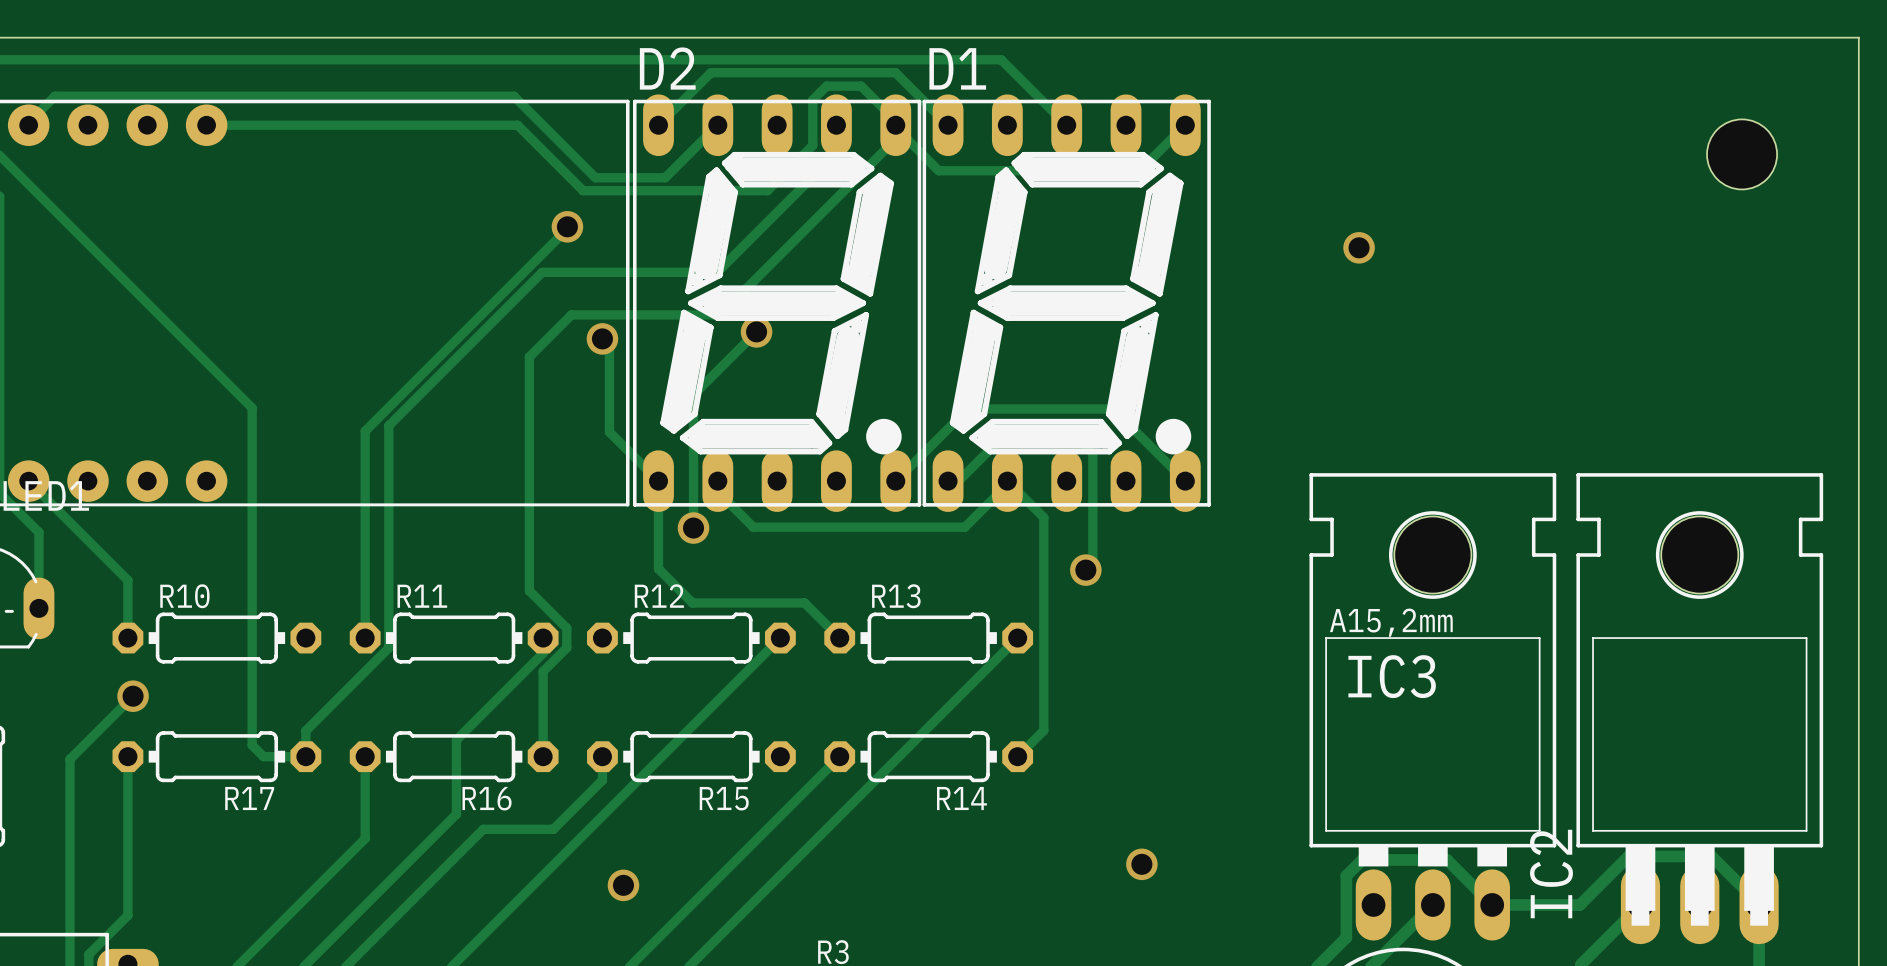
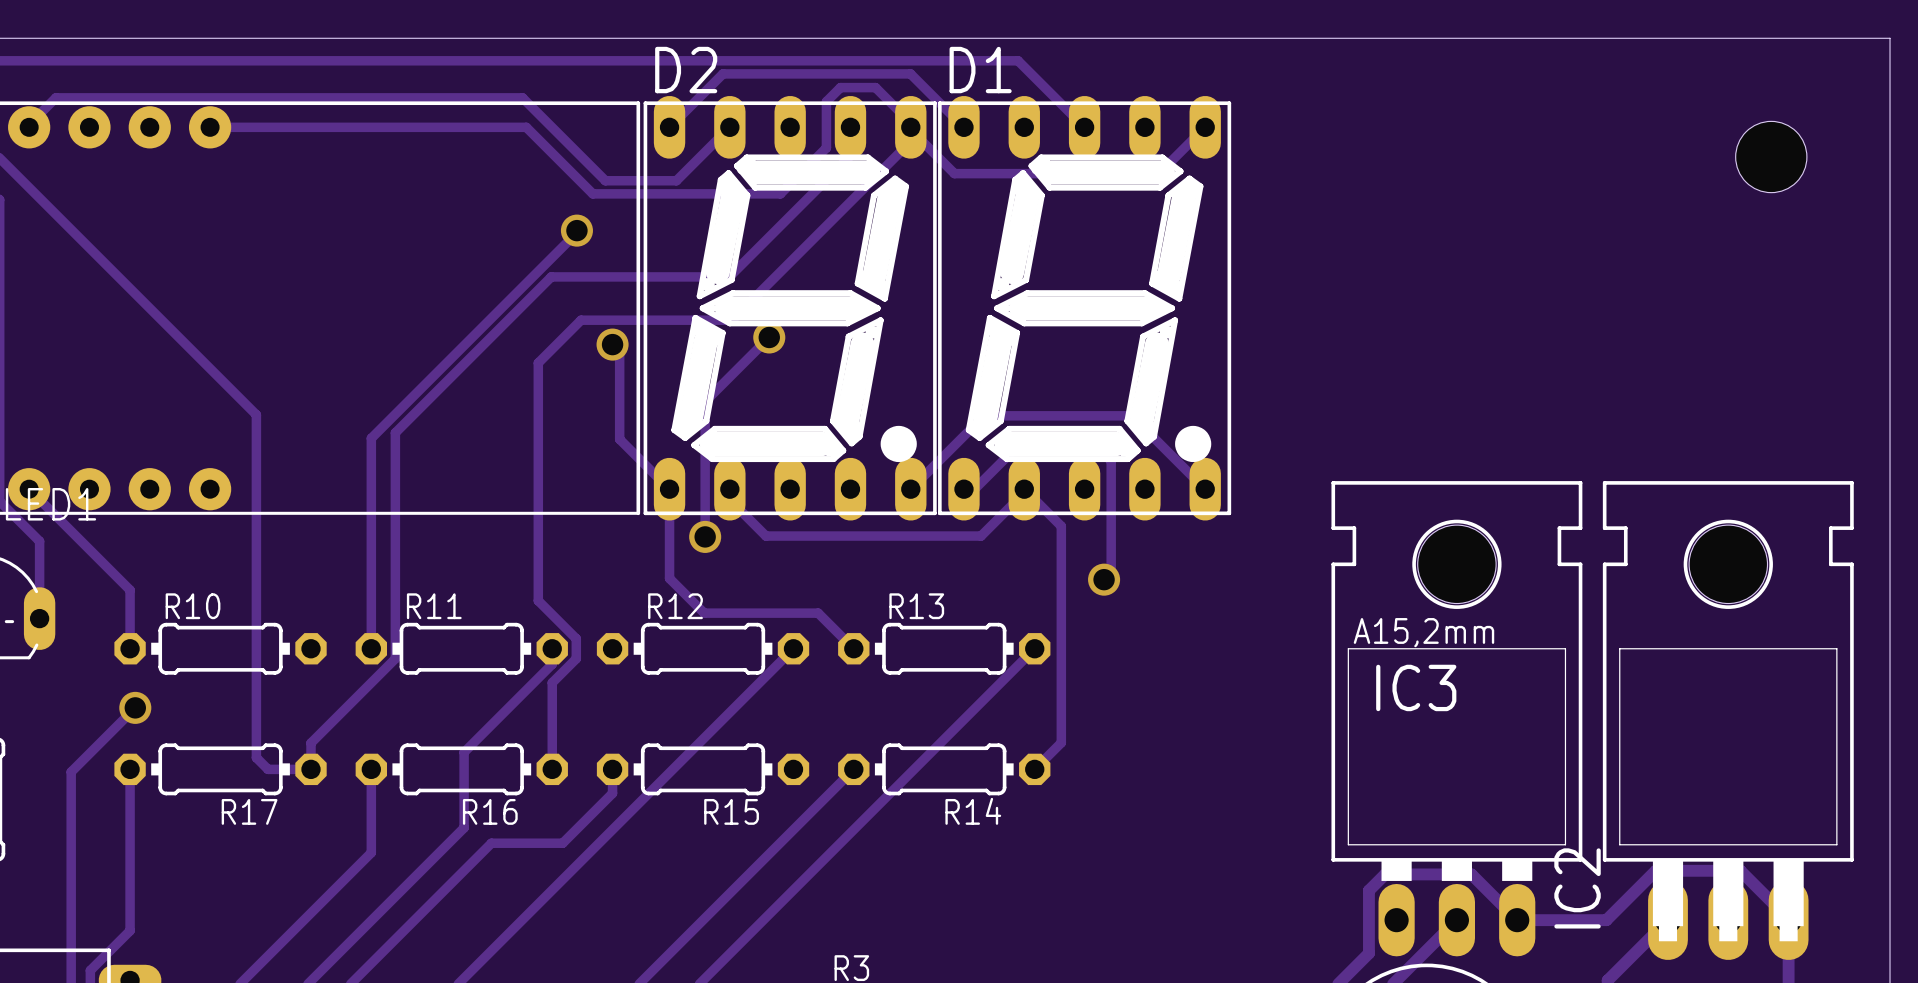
via: (1359, 247) -> none
via: (1141, 864) -> none
via: (623, 885) -> none

